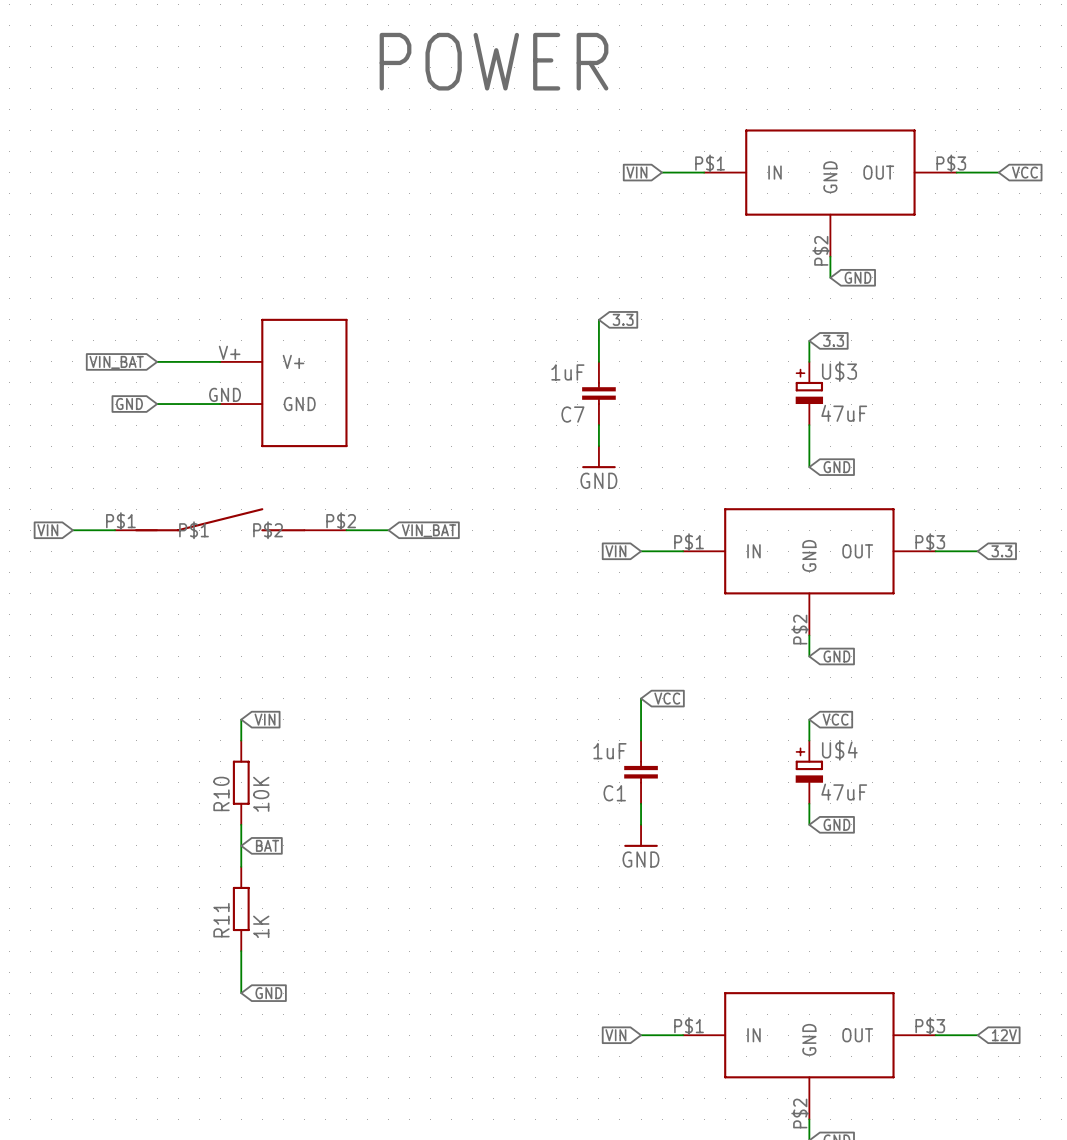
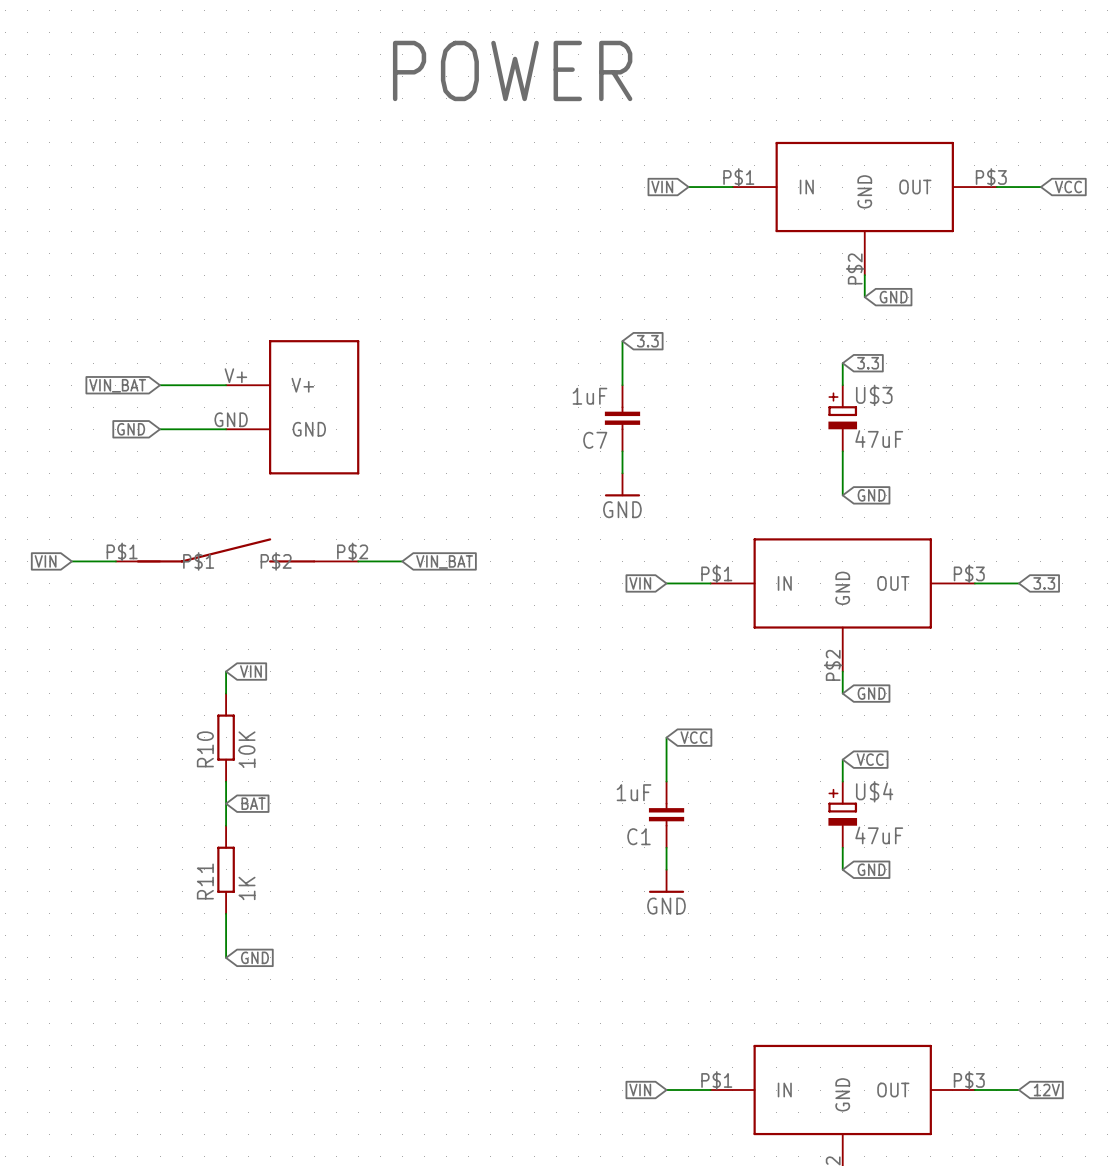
wire: (241, 719) (241, 740) -> (226, 671) (226, 693)
global label position: VIN (265, 719) -> VIN (250, 671)
R10 position: (241, 782) -> (226, 737)
wire: (241, 824) (241, 866) -> (226, 781) (226, 825)
global label position: BAT (267, 845) -> BAT (253, 803)
R11 position: (241, 908) -> (226, 869)
wire: (241, 951) (241, 993) -> (226, 913) (226, 957)
global label position: GND (268, 993) -> GND (254, 957)

